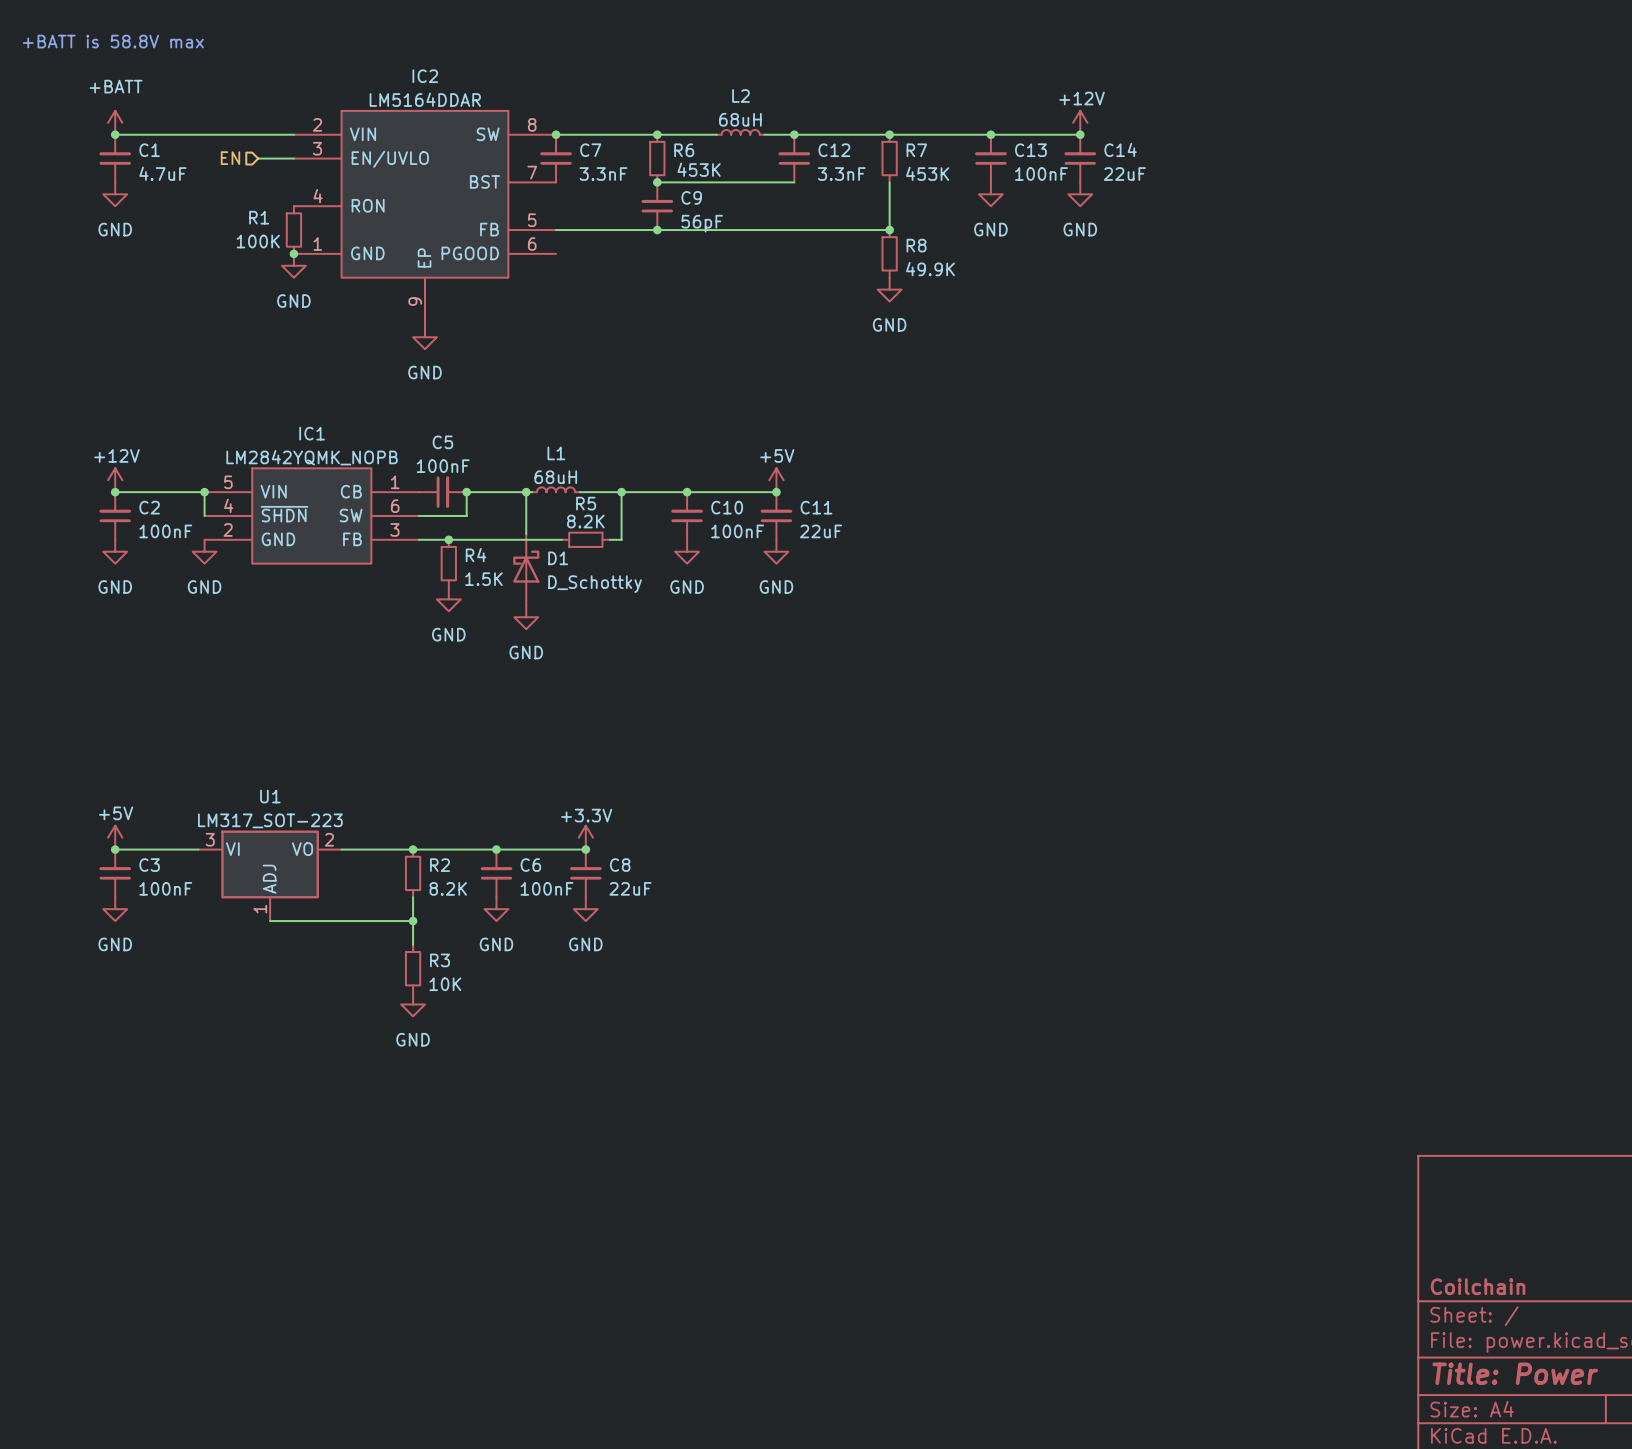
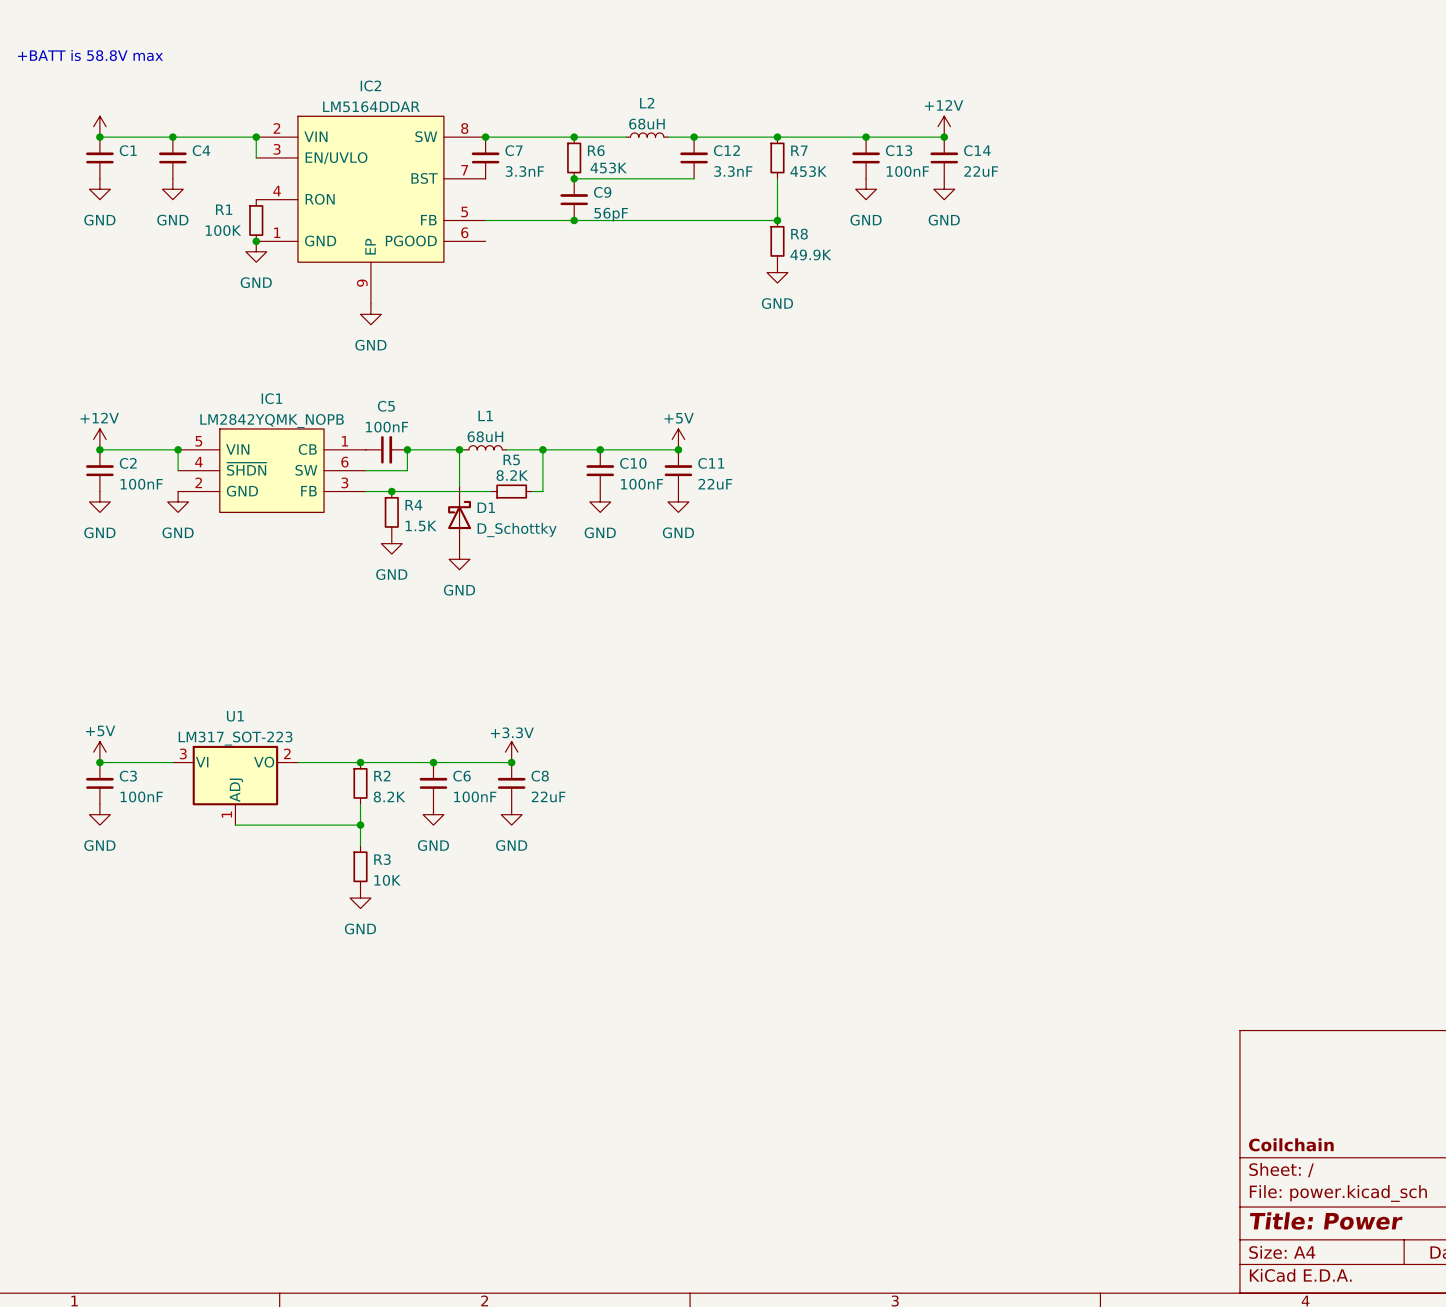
power symbol text: +BATT (116, 86) -> none
junction: none -> (172, 137)
junction: none -> (256, 137)
C4: none -> (172, 157)
hierarchical label: EN (230, 158) -> none
wire: (258, 158) (293, 158) -> (256, 137) (256, 157)
C1 value: 4.7uF (162, 173) -> none
power symbol: none -> GND (172, 189)

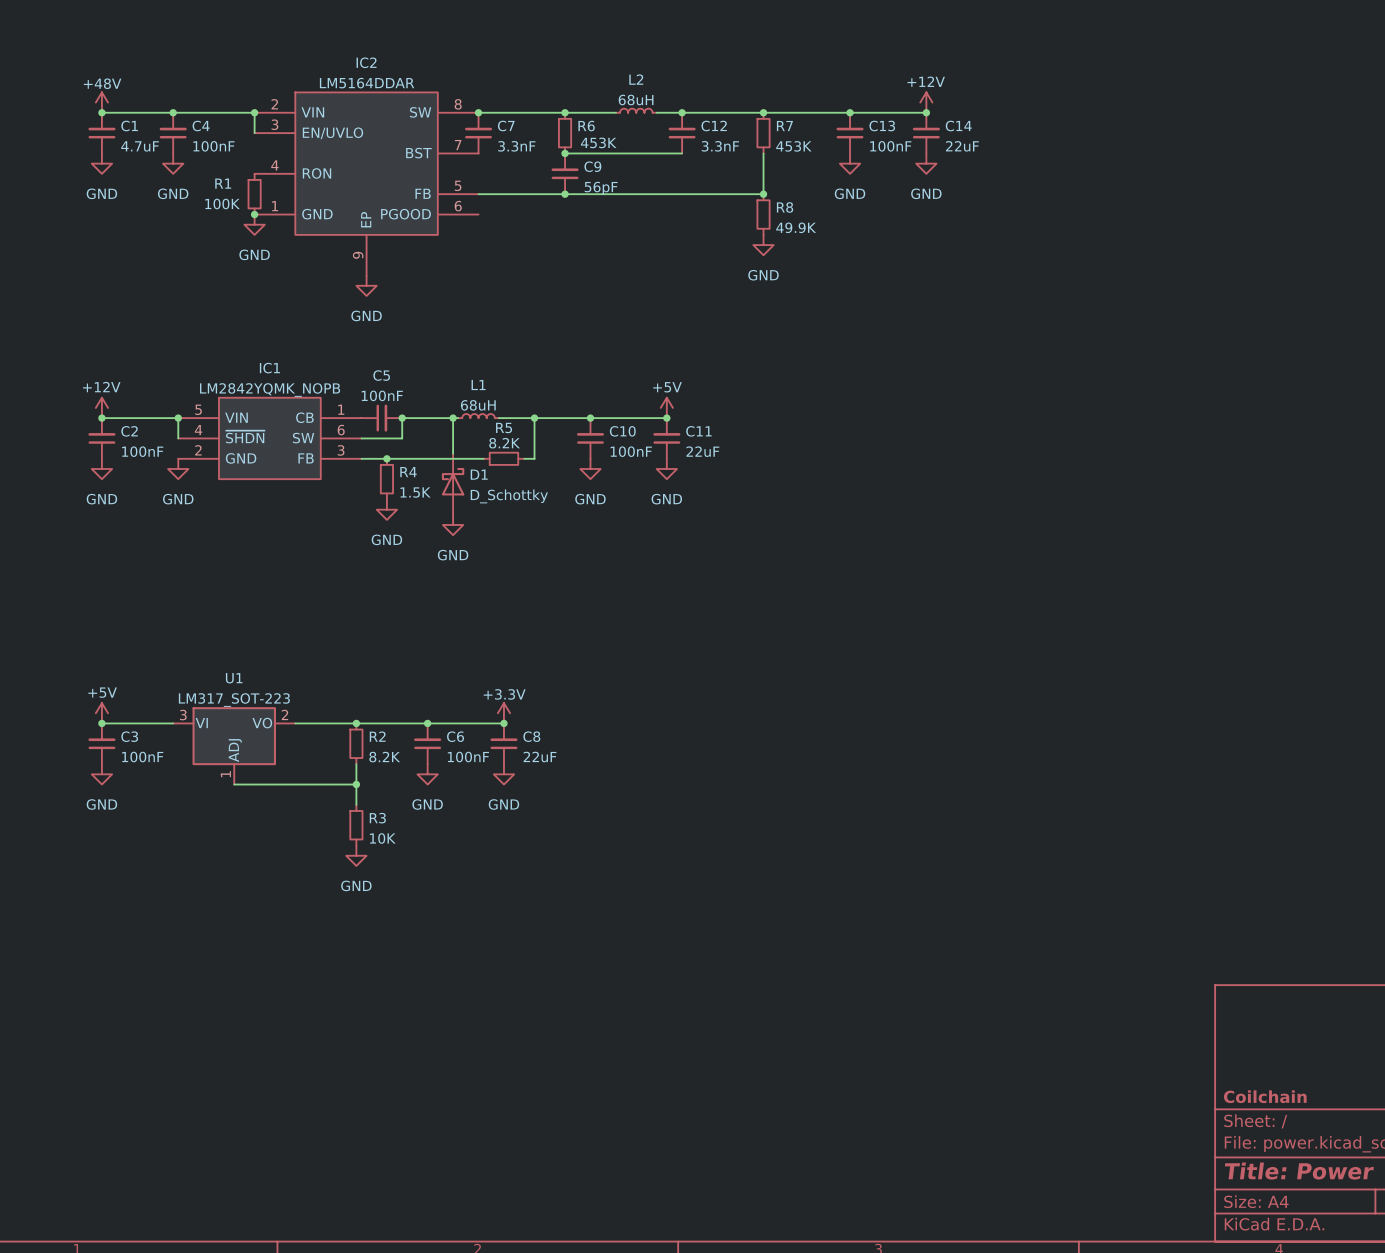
text: +BATT is 58.8V max (90, 55) -> none
power symbol text: none -> +48V (102, 83)
C1 value: none -> 4.7uF (140, 146)
C4 value: none -> 100nF (213, 146)

